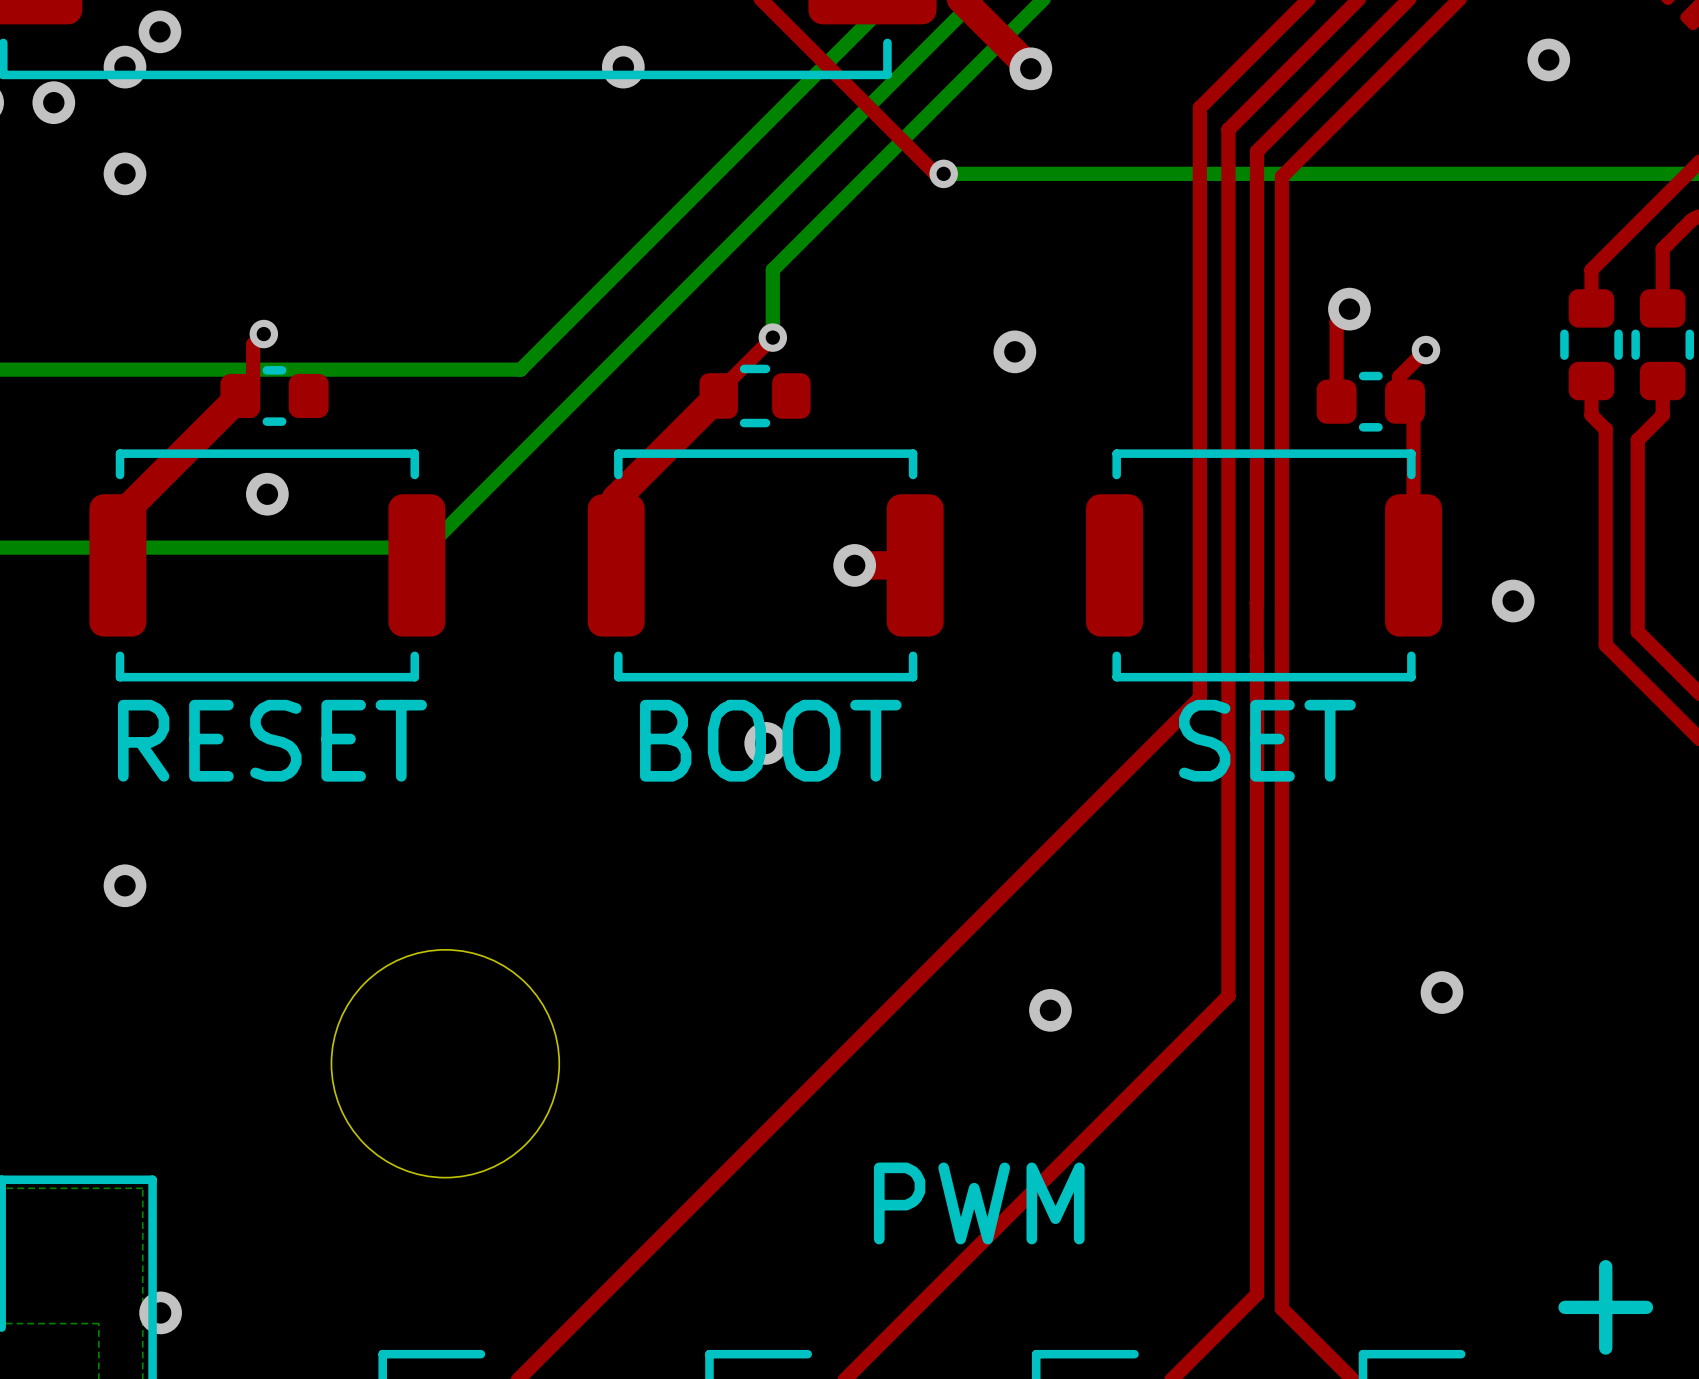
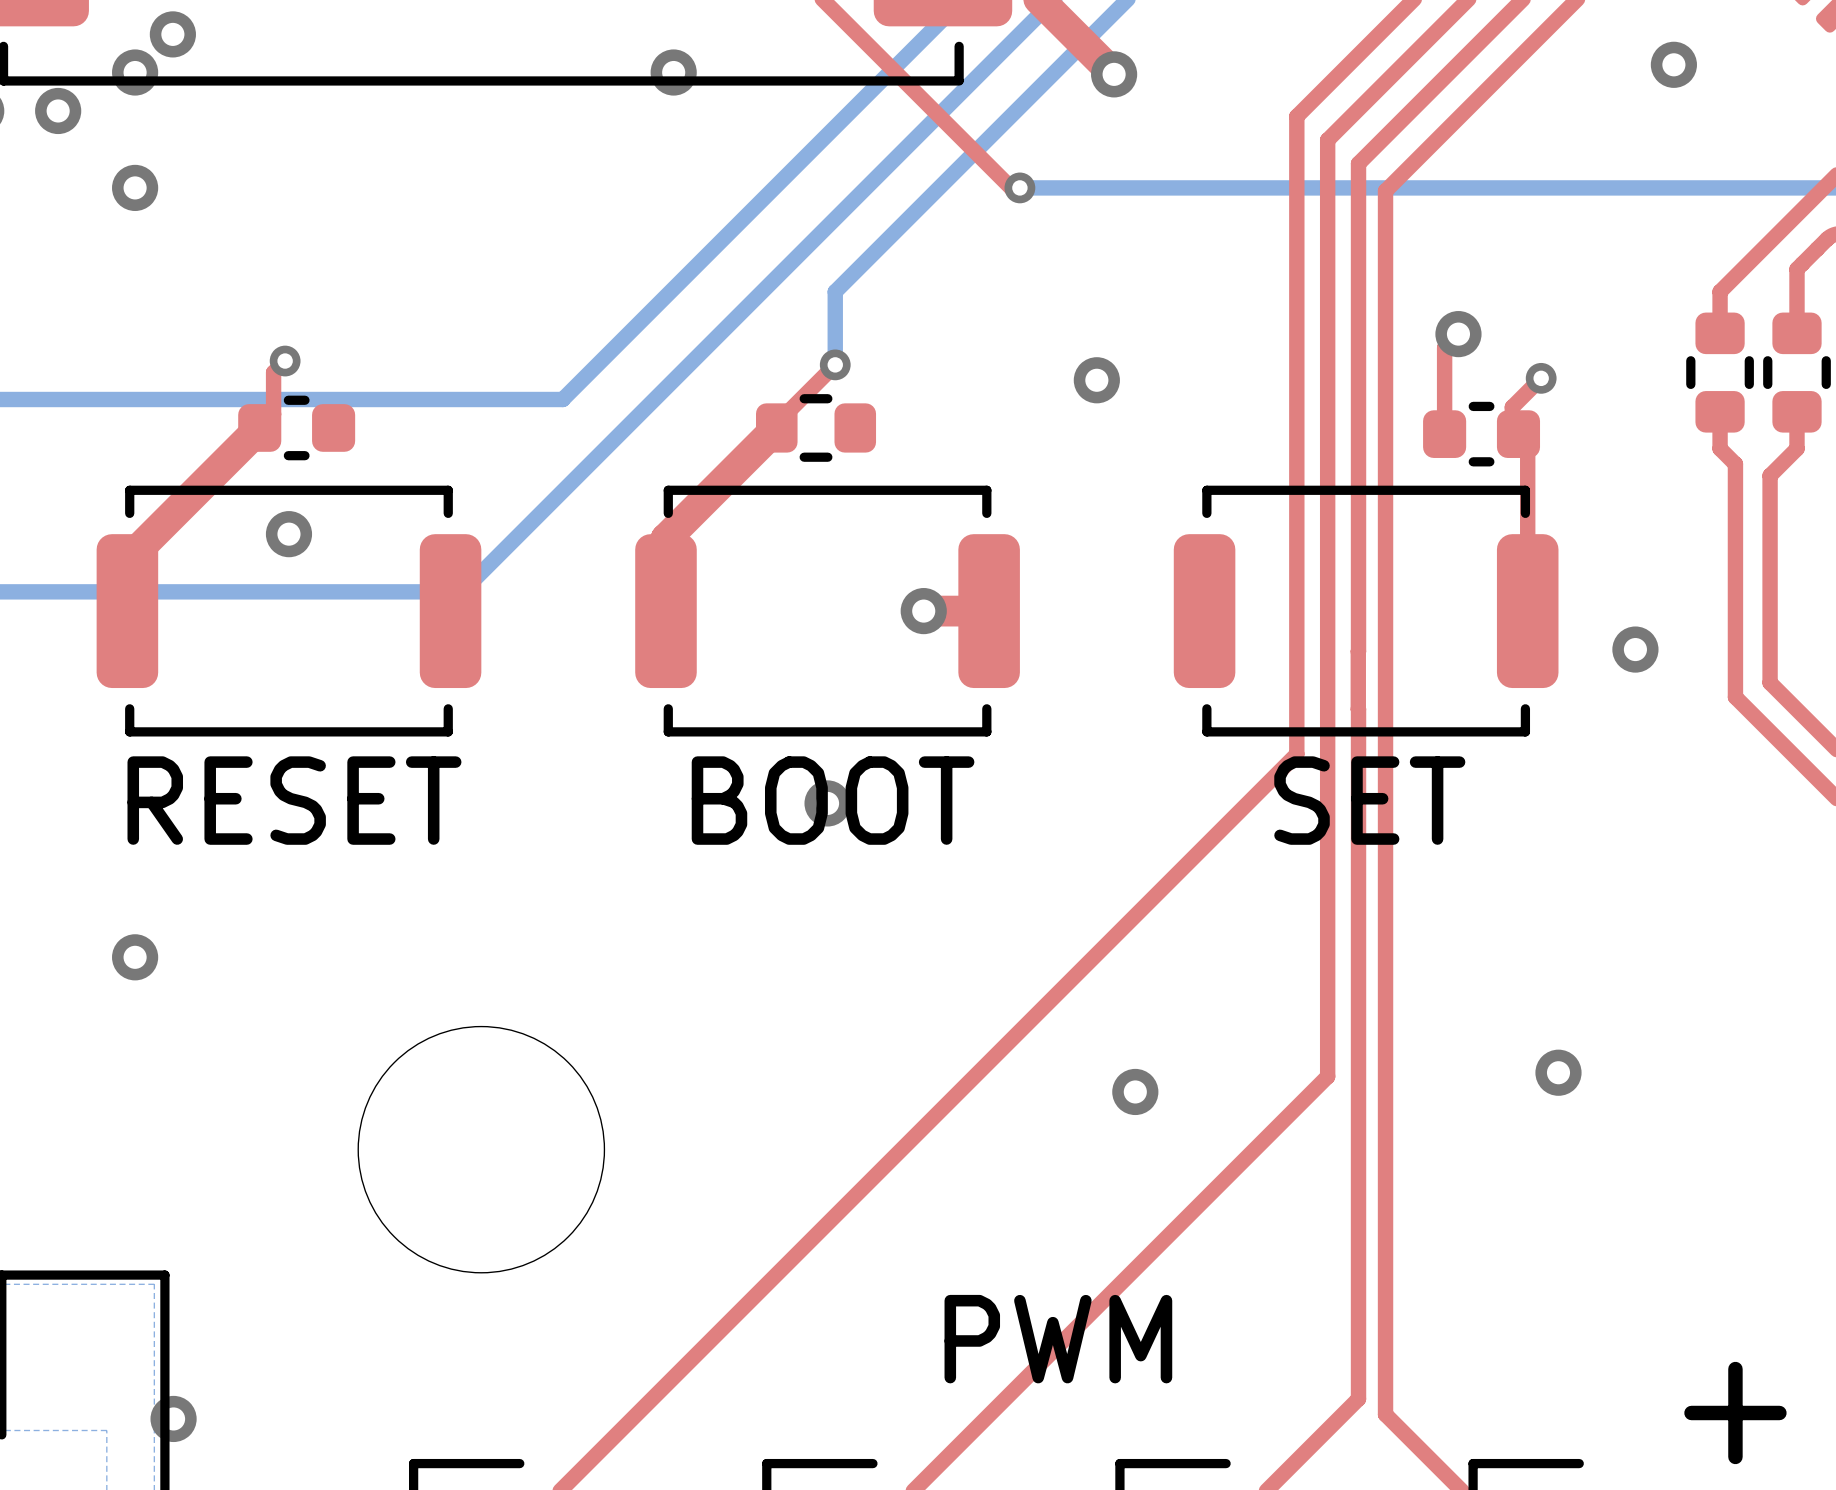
text position: PWM (979, 1203) -> PWM (1058, 1339)

